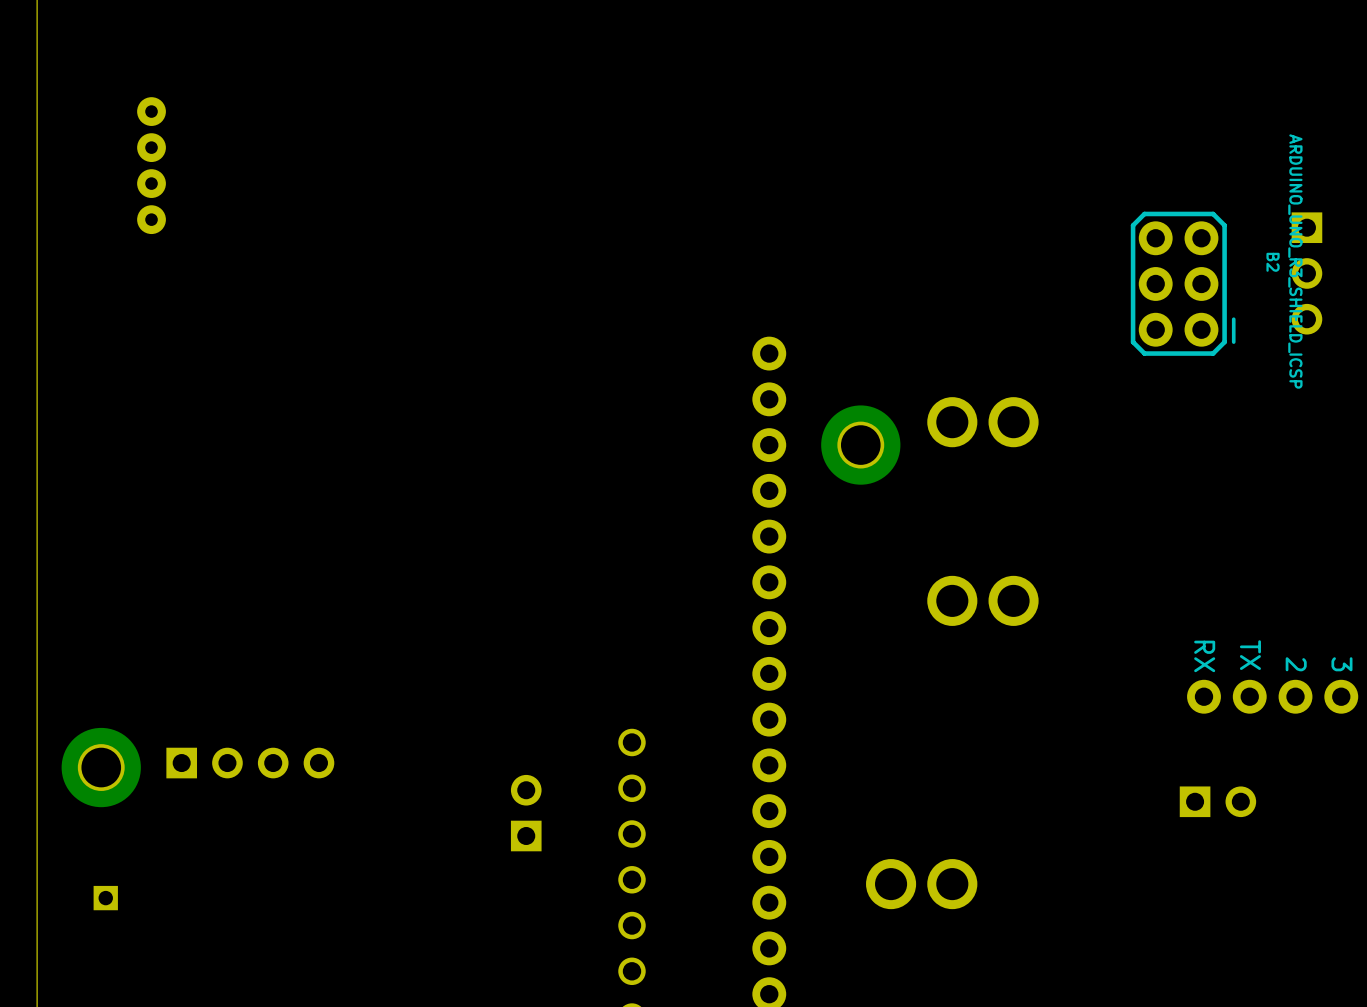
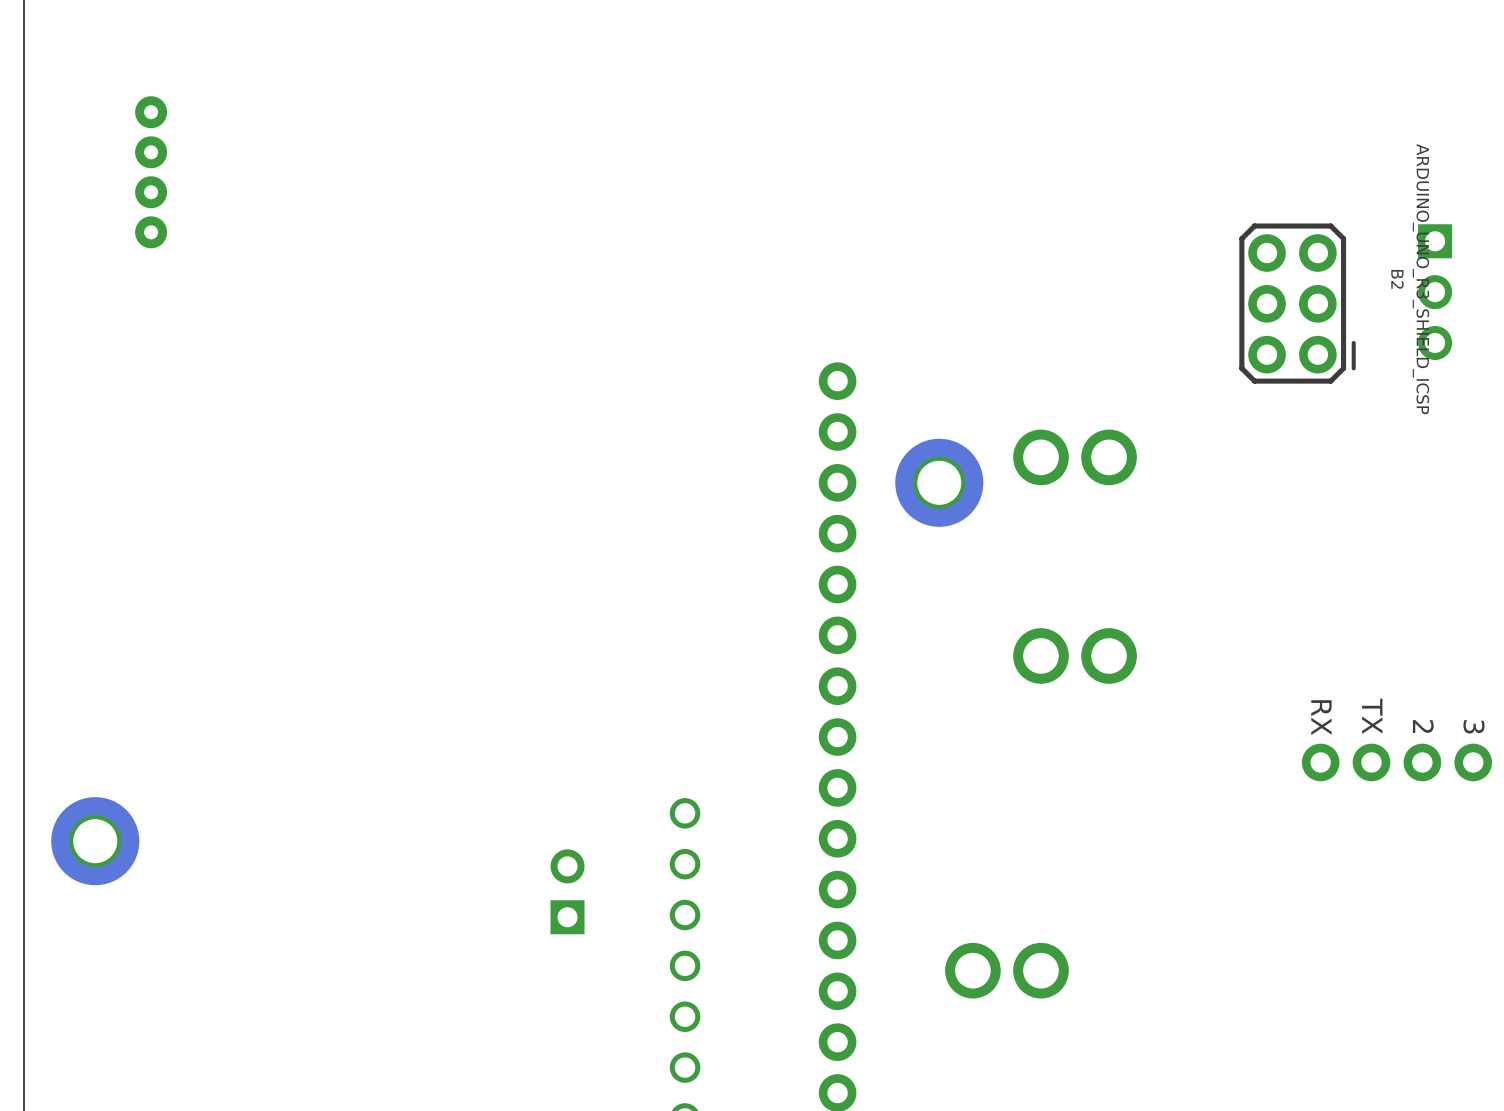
part: (250, 763) -> none
part: (1217, 801) -> none
part: (105, 898) -> none

